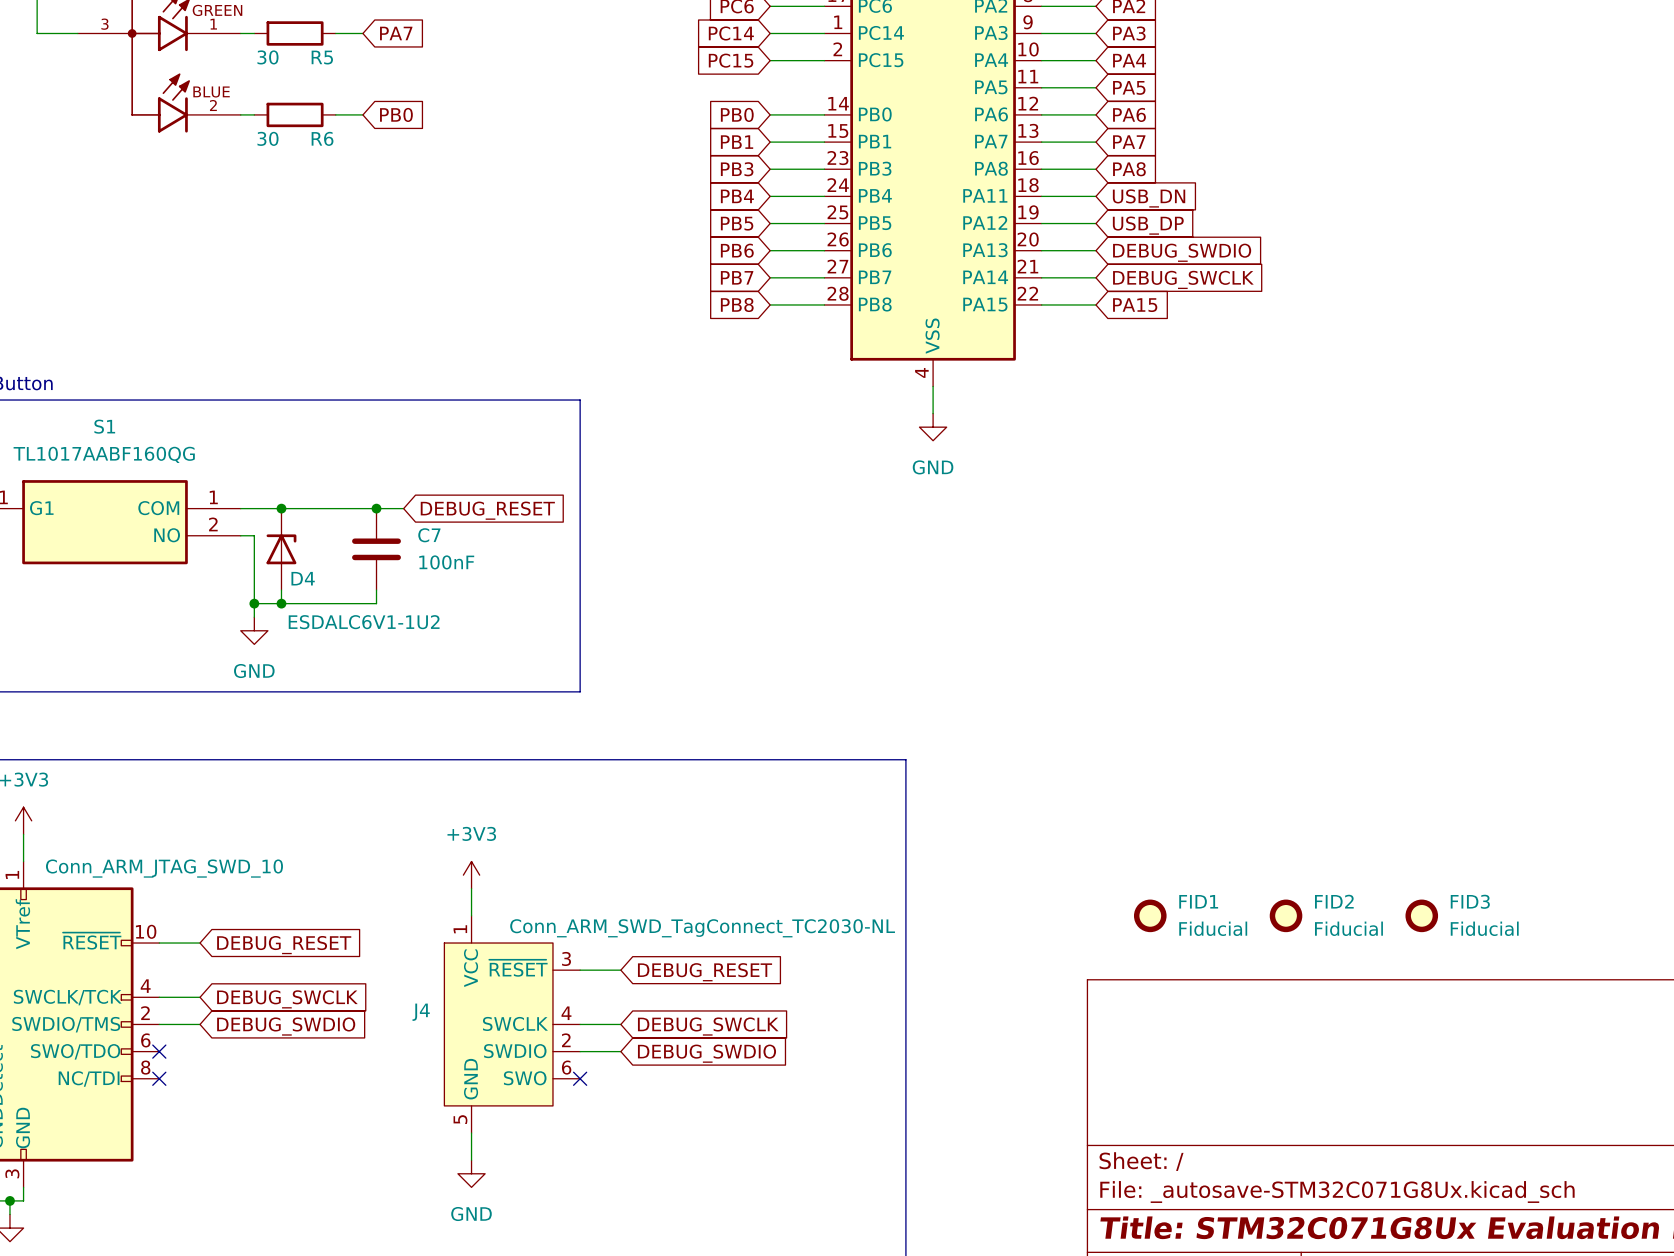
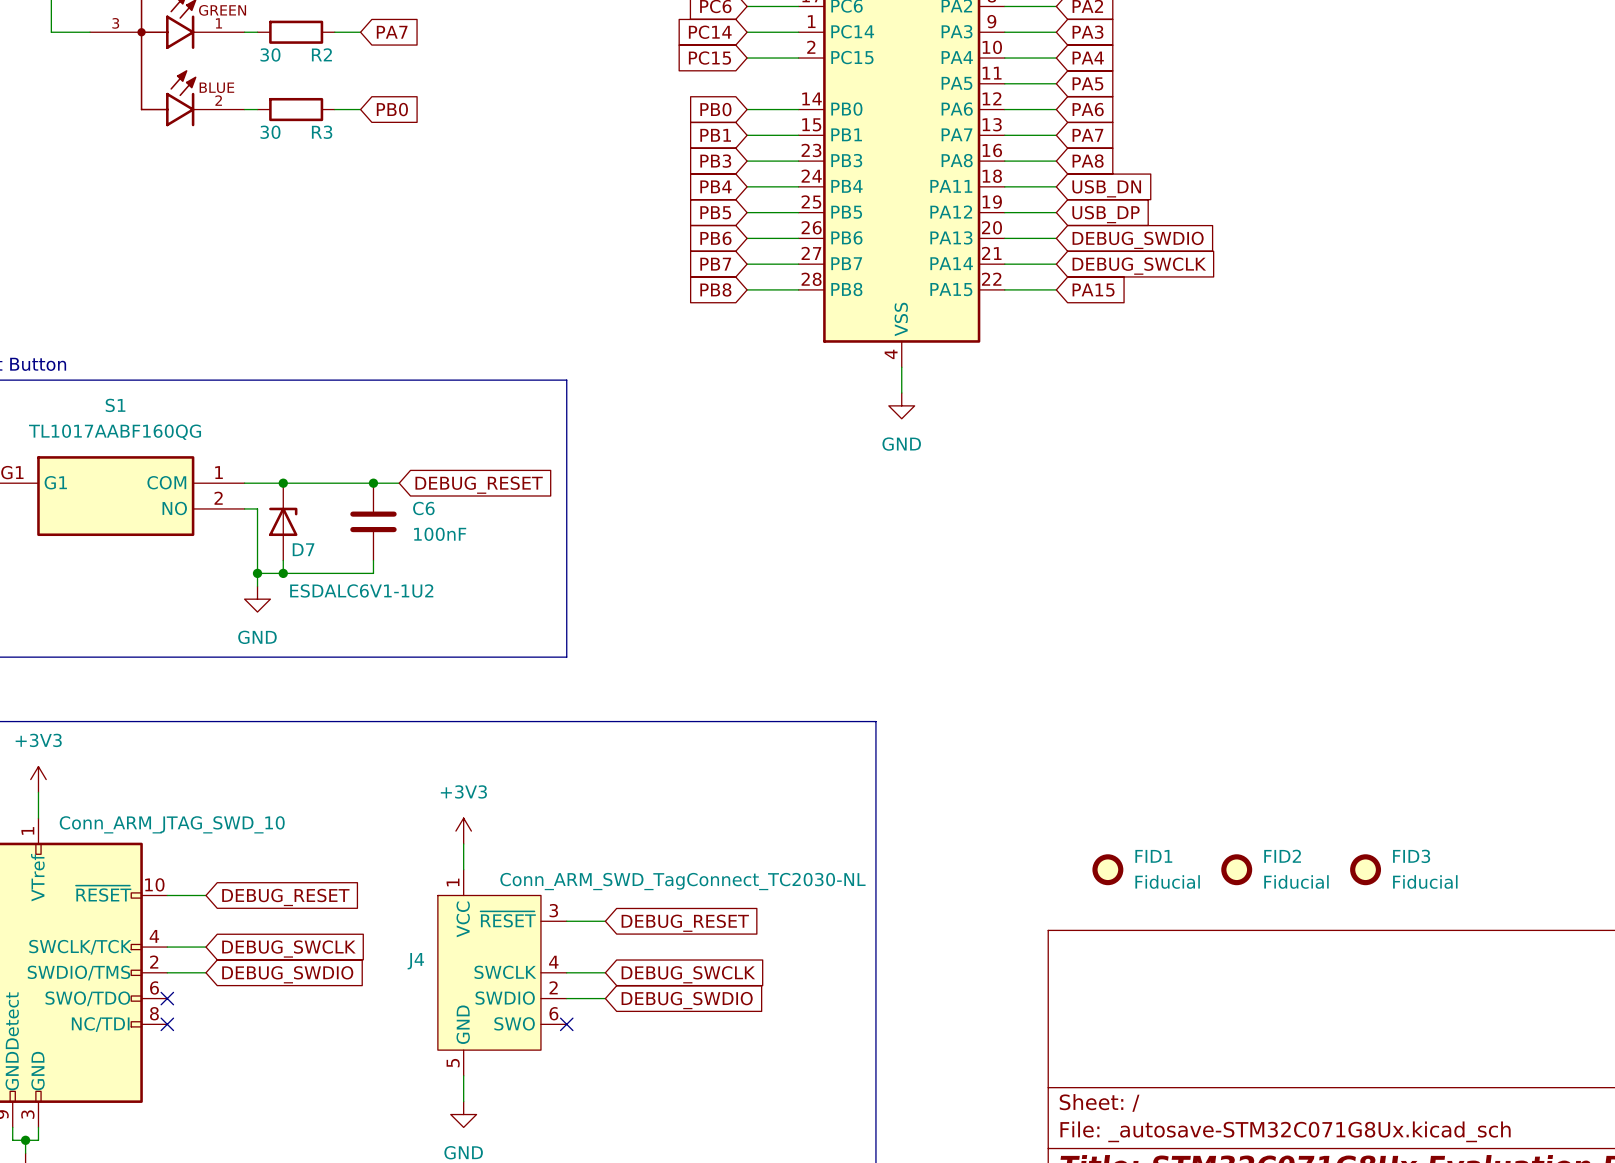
R5 name: R5 (322, 57) -> R2 (321, 54)
R6 name: R6 (322, 138) -> R3 (322, 132)
C7 name: C7 (429, 535) -> C6 (423, 508)
D4 name: D4 (303, 578) -> D7 (303, 549)

